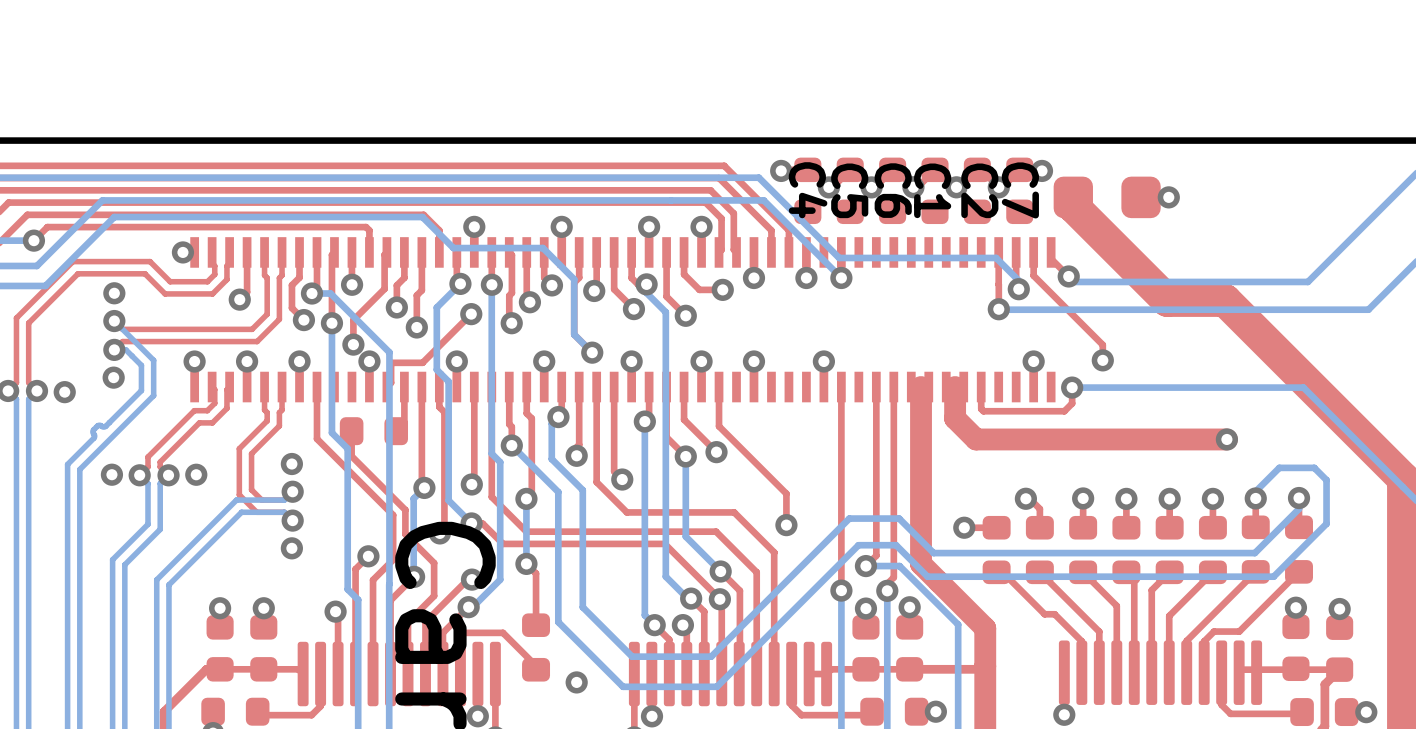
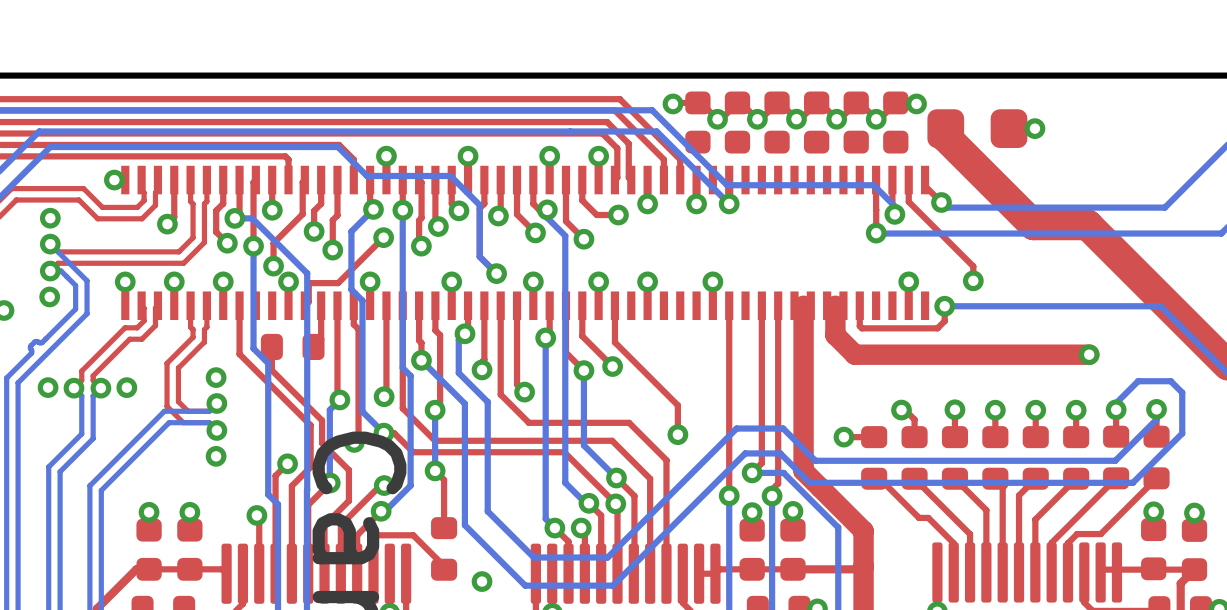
C4 name: C4 (808, 190) -> none
C5 name: C5 (849, 190) -> none
C6 name: C6 (893, 190) -> none
C1 name: C1 (932, 190) -> none
C2 name: C2 (979, 190) -> none
C7 name: C7 (1020, 190) -> none

